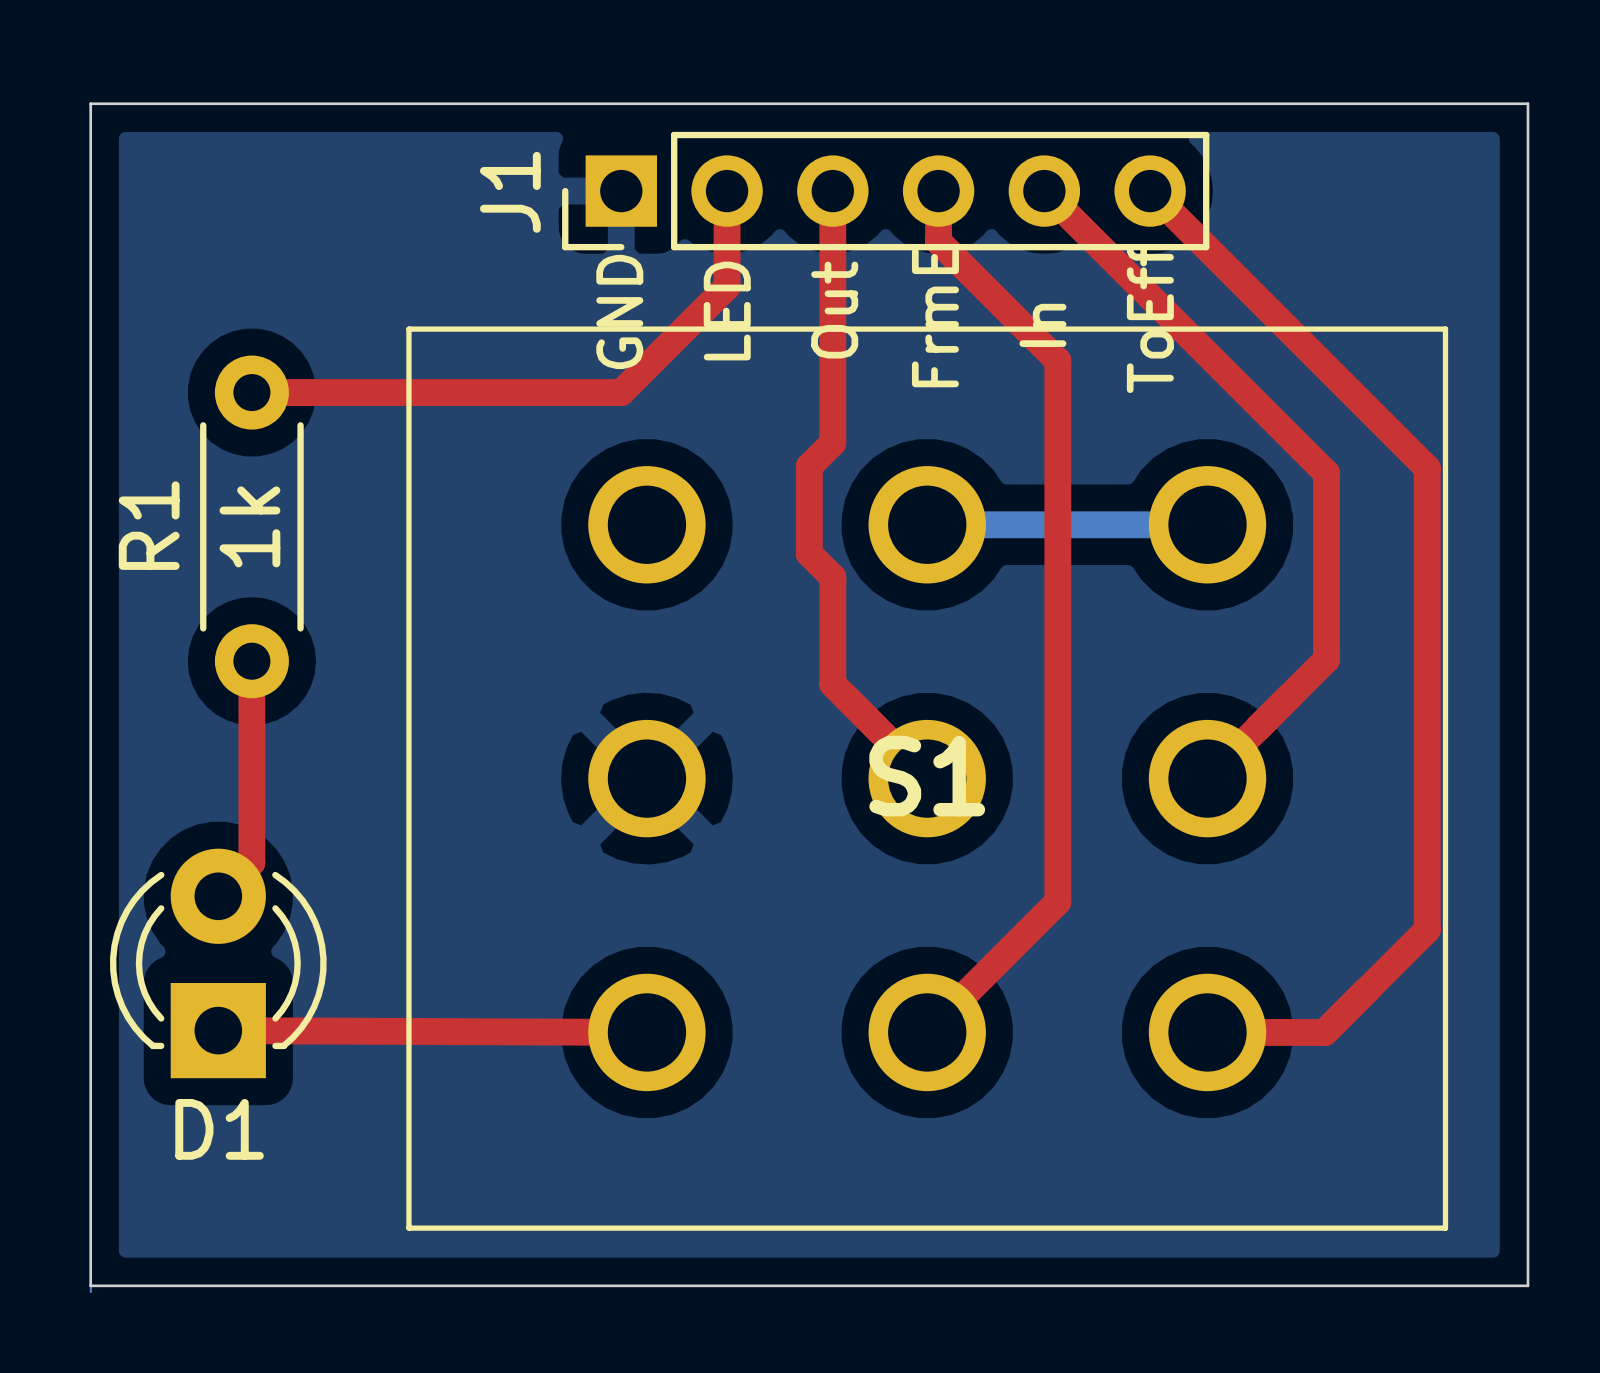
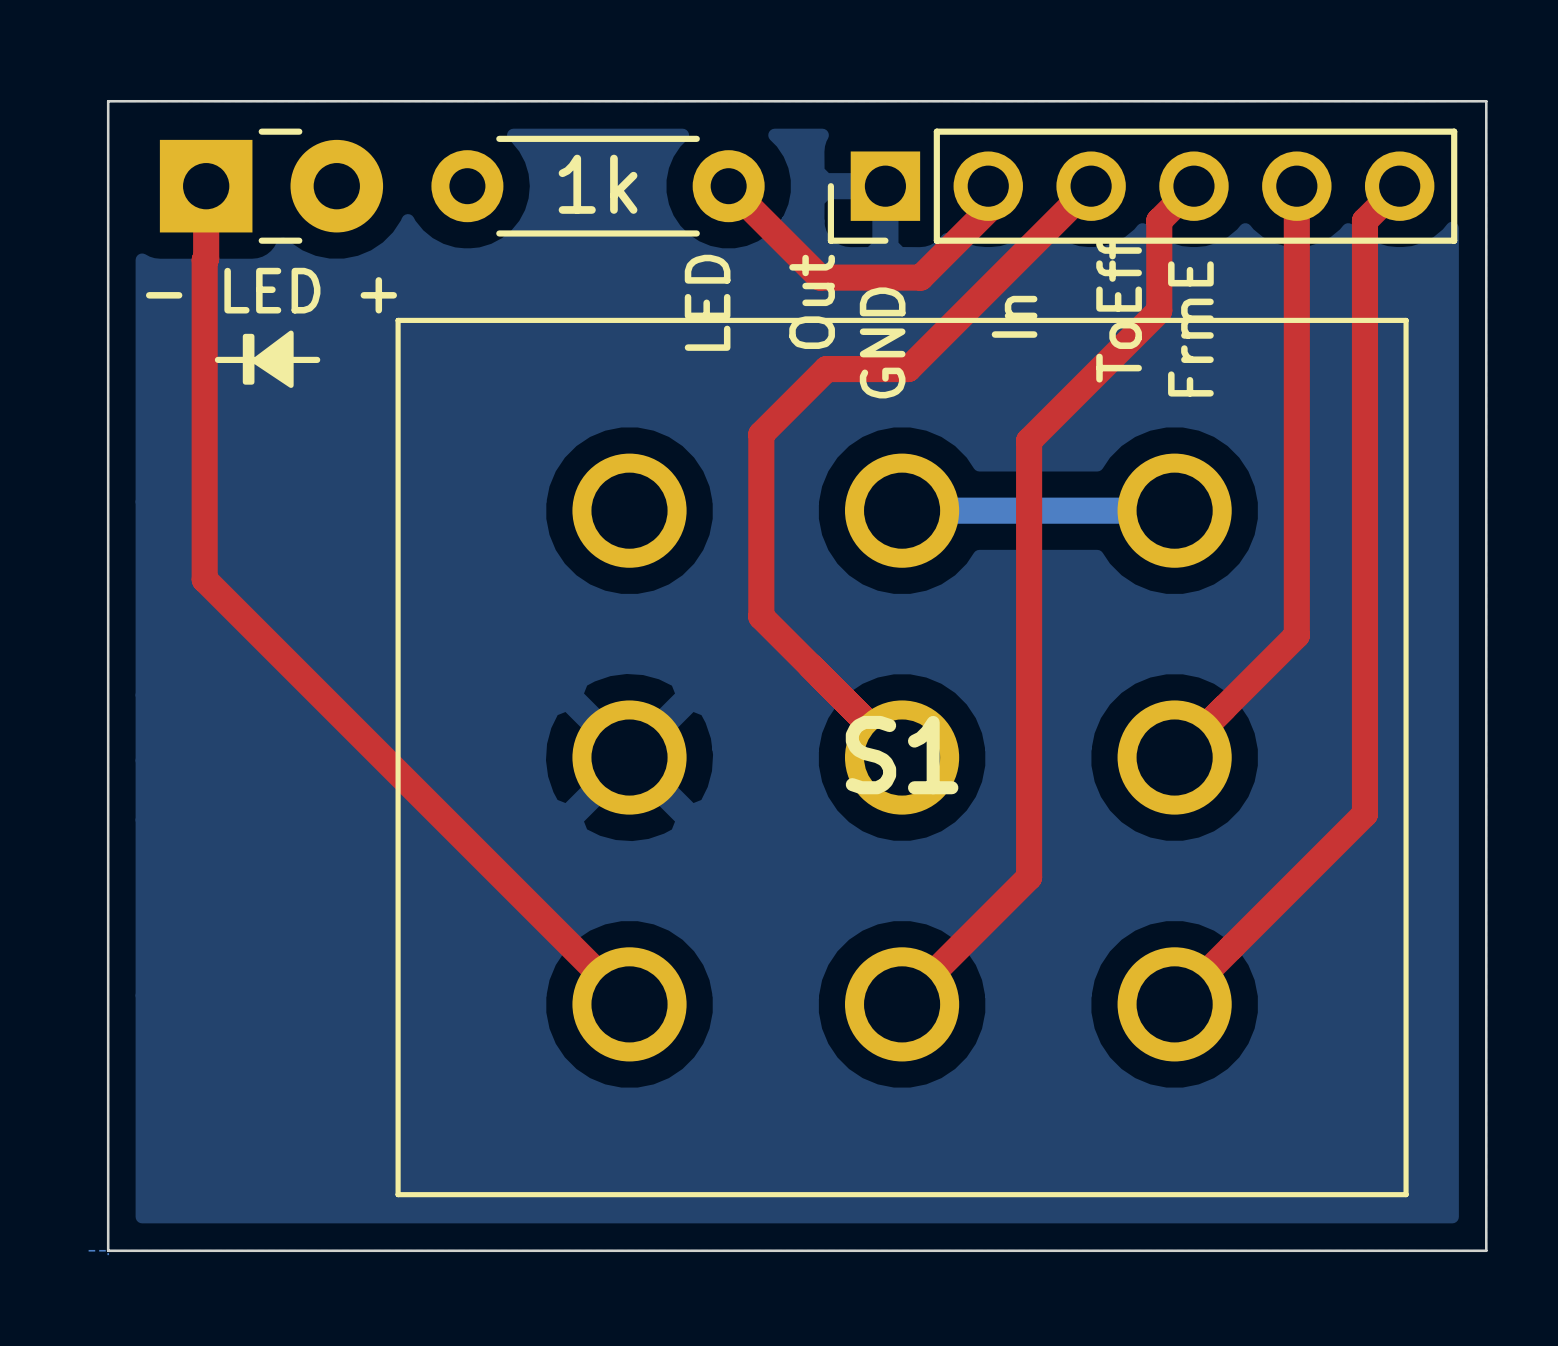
board edge: (110, 103) (90, 103) (90, 1285) (110, 1285) -> (108, 101) (108, 1250)
part: none -> - LED + (271, 186)
part: none -> 1k (598, 186)
top track: (727, 191) (727, 286) (621, 392) (251, 392) -> none
top track: none -> (728, 186) (820, 277) (920, 277) (988, 210) (988, 186)
top track: (832, 191) (832, 442) (809, 466) (809, 553) (832, 577) (832, 684) -> (1091, 186) (908, 369) (826, 369) (761, 434) (761, 616) (810, 665)
J1: (885, 191) -> none
top track: (938, 191) (938, 241) (1057, 360) (1057, 453) -> (1193, 186) (1159, 220) (1159, 310) (1029, 440)
top track: (1044, 191) (1326, 473) (1326, 659) -> (1296, 186) (1296, 635) (1290, 641)
top track: (1150, 191) (1427, 468) (1427, 929) (1324, 1032) (1207, 1032) -> (1399, 186) (1364, 220) (1364, 814) (1174, 1004)
part: none -> (1142, 186)
text position: FrmE (935, 317) -> FrmE (1190, 328)
drawing: none -> [242, 330, 294, 388]
line: none -> (217, 359) (244, 359)
line: none -> (291, 359) (317, 359)
R1: 1k (251, 526) -> none
top track: (251, 661) (251, 862) (218, 896) -> none
D1: (218, 963) -> none
top track: (184, 1030) (646, 1032) -> (206, 186) (204, 579) (629, 1004)

